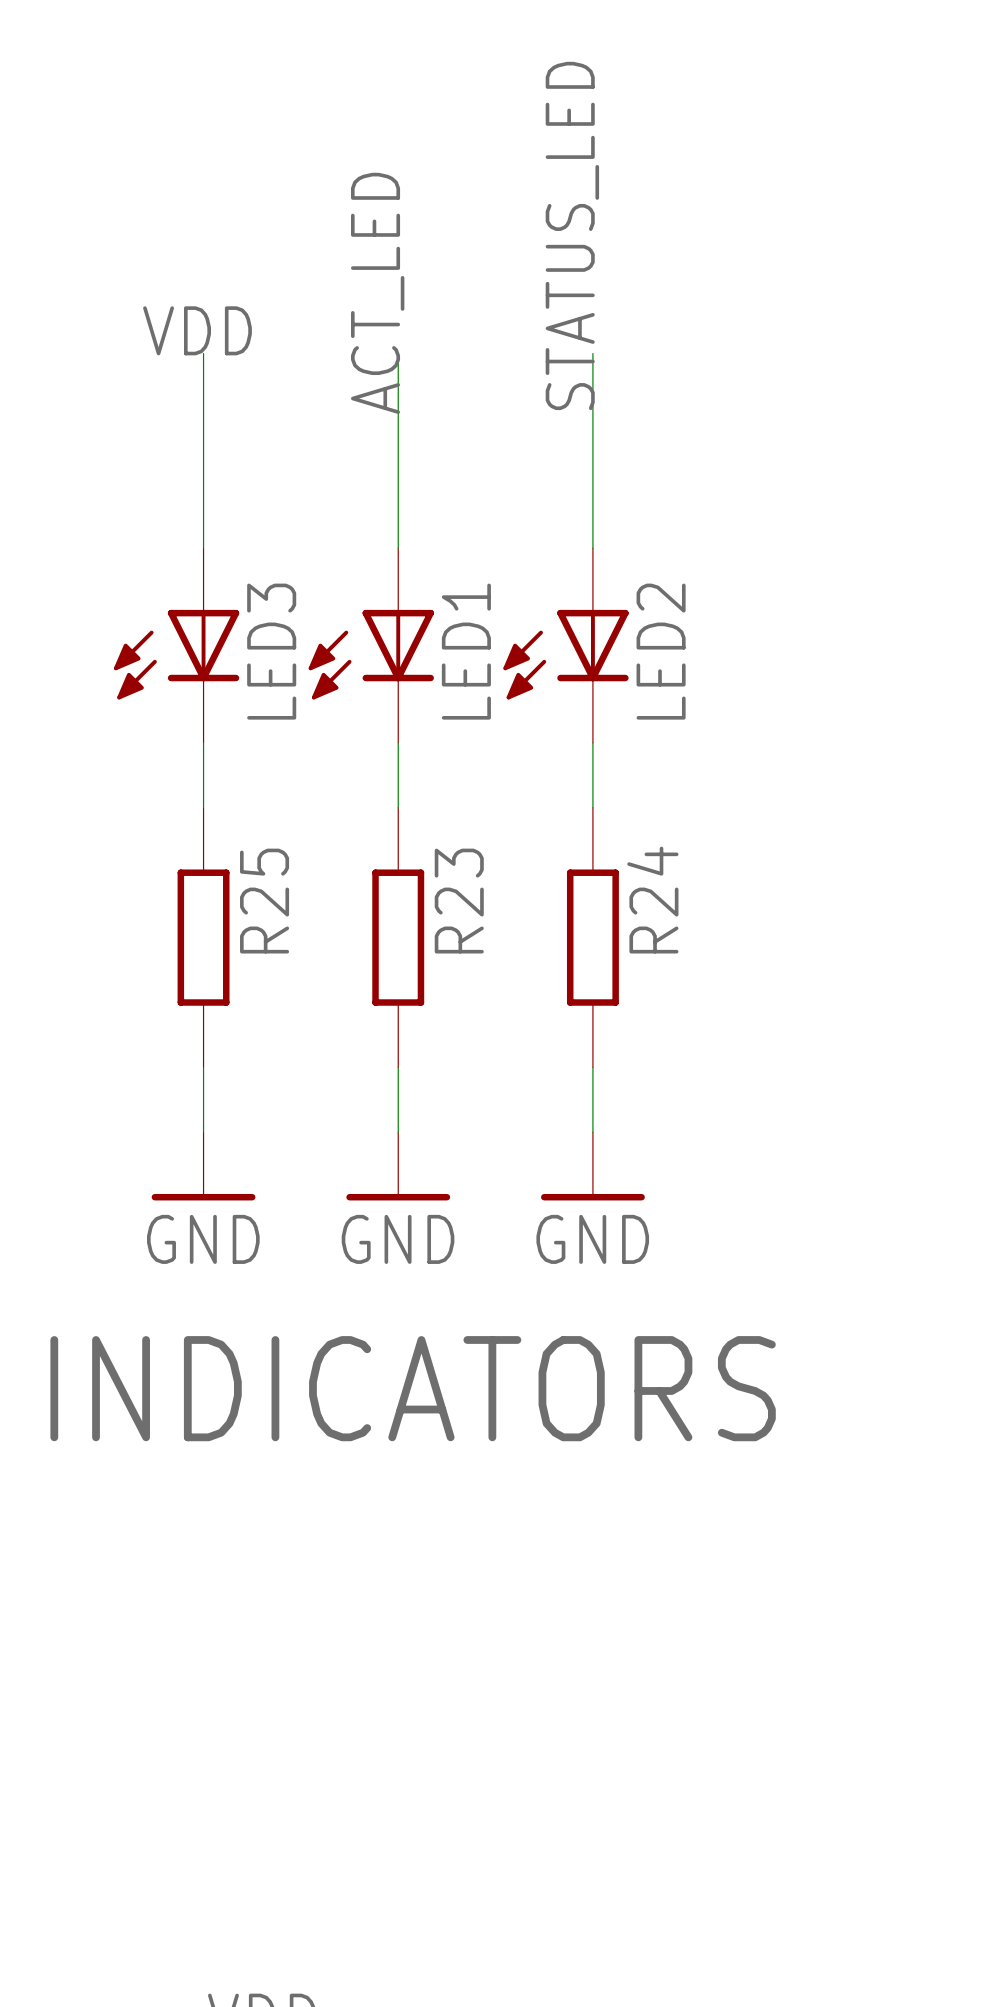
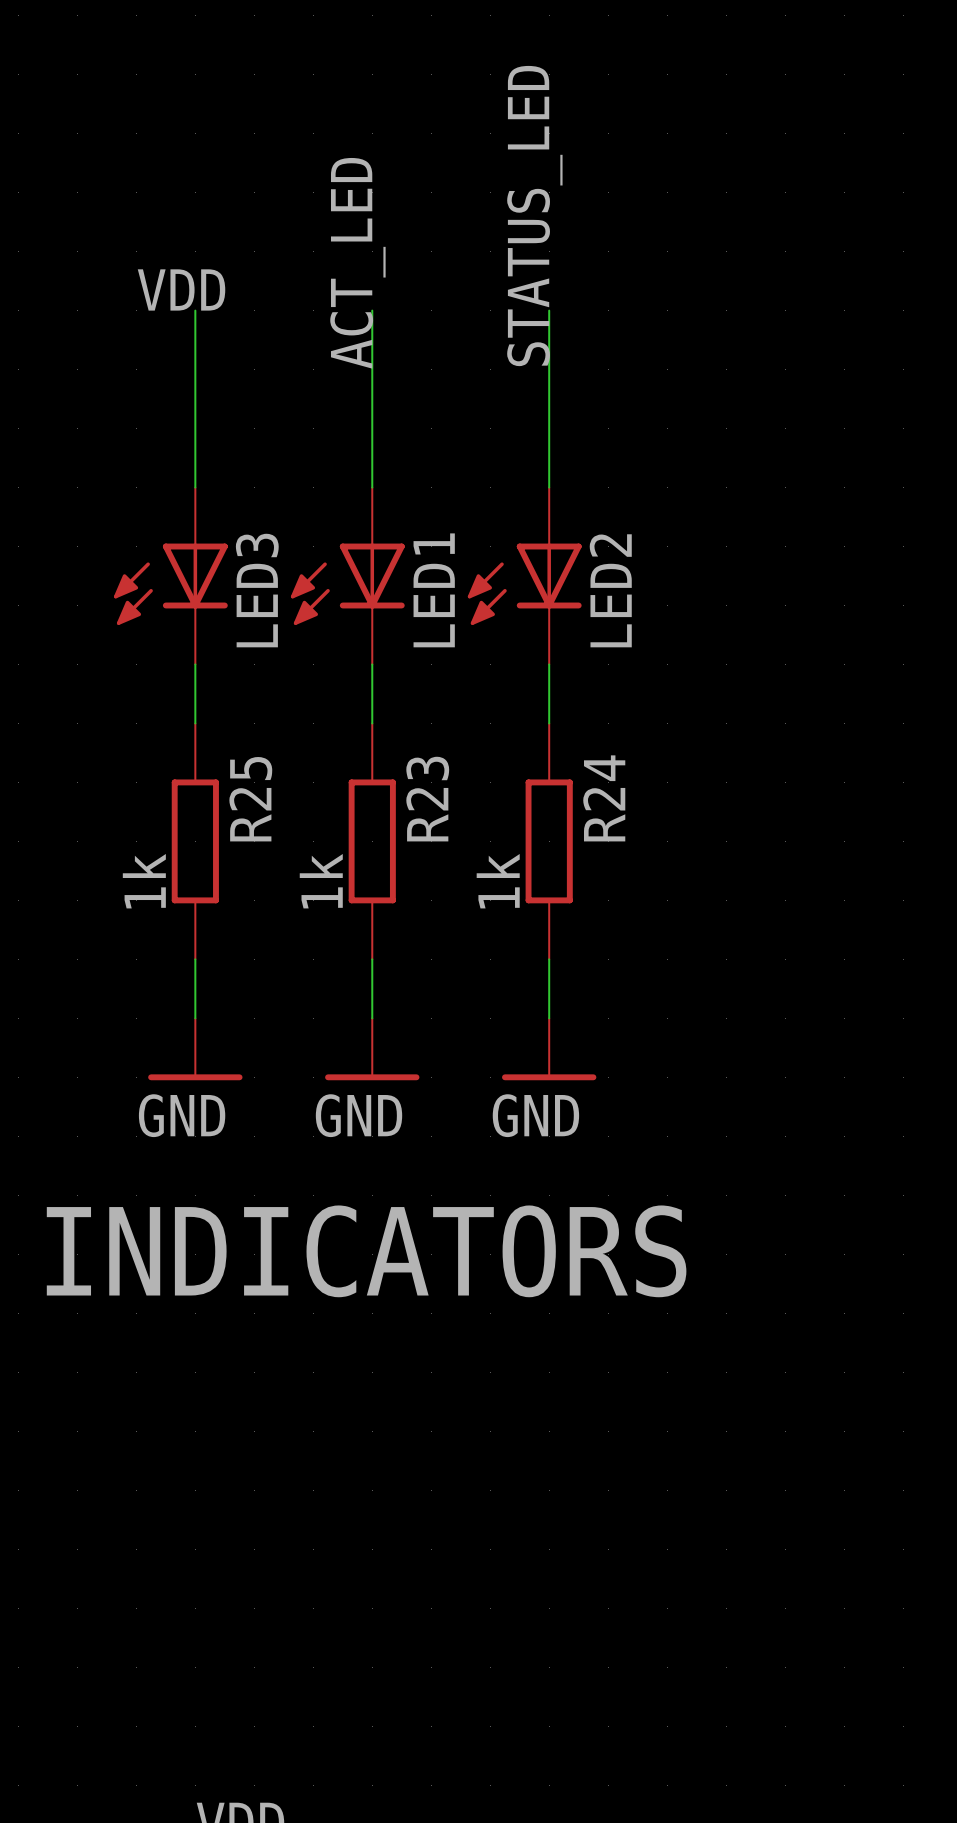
R25 value: none -> 1k (144, 881)
R23 value: none -> 1k (321, 881)
R24 value: none -> 1k (498, 881)

